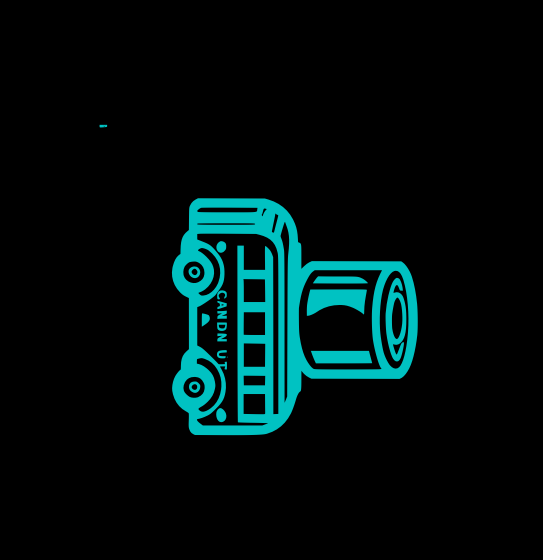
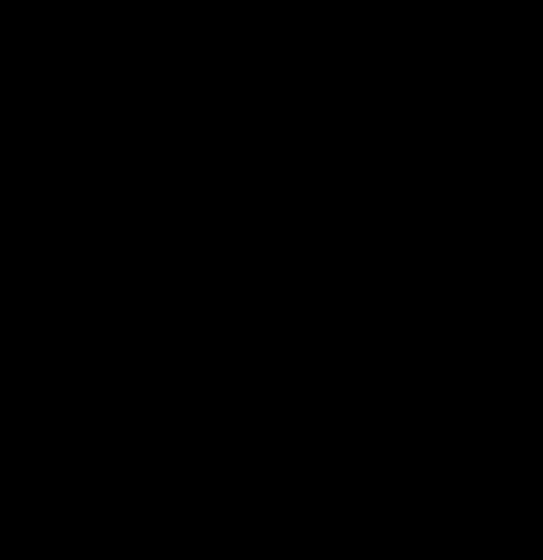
drawing: [99, 124, 418, 436] -> none

